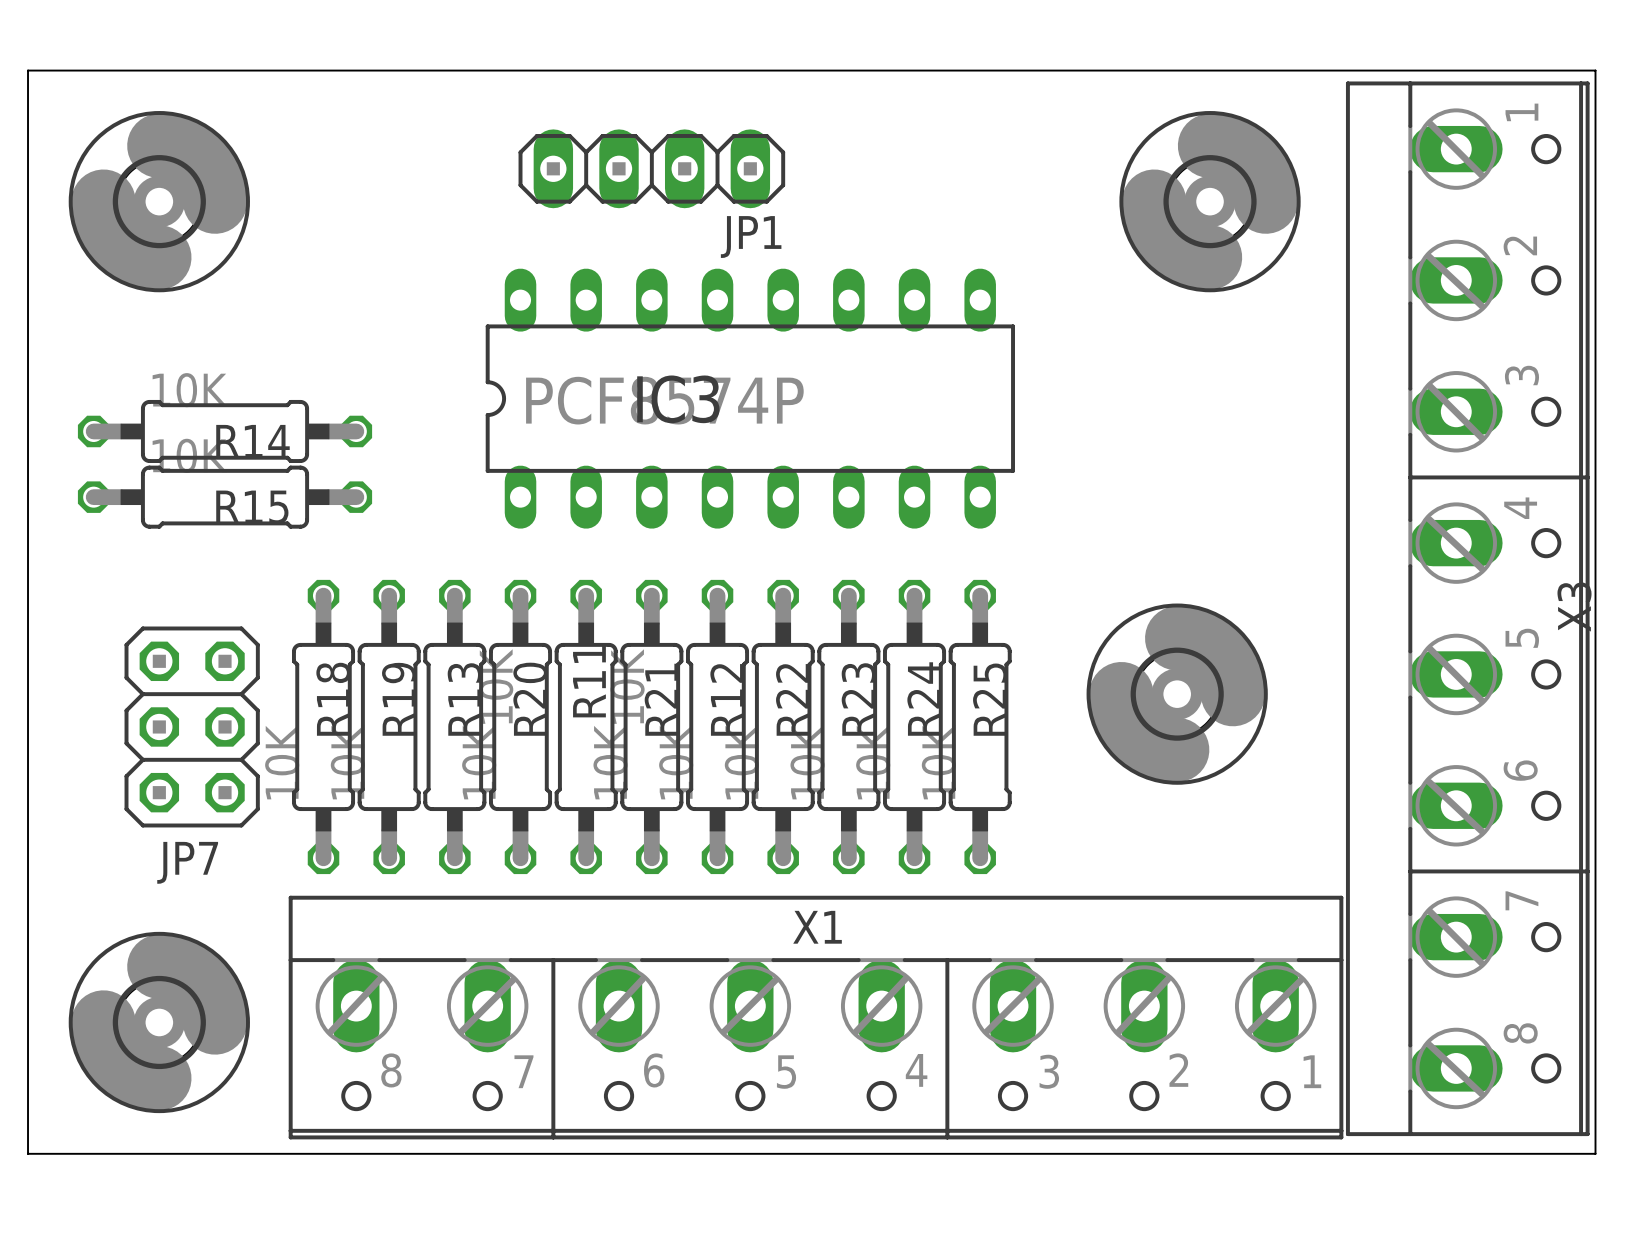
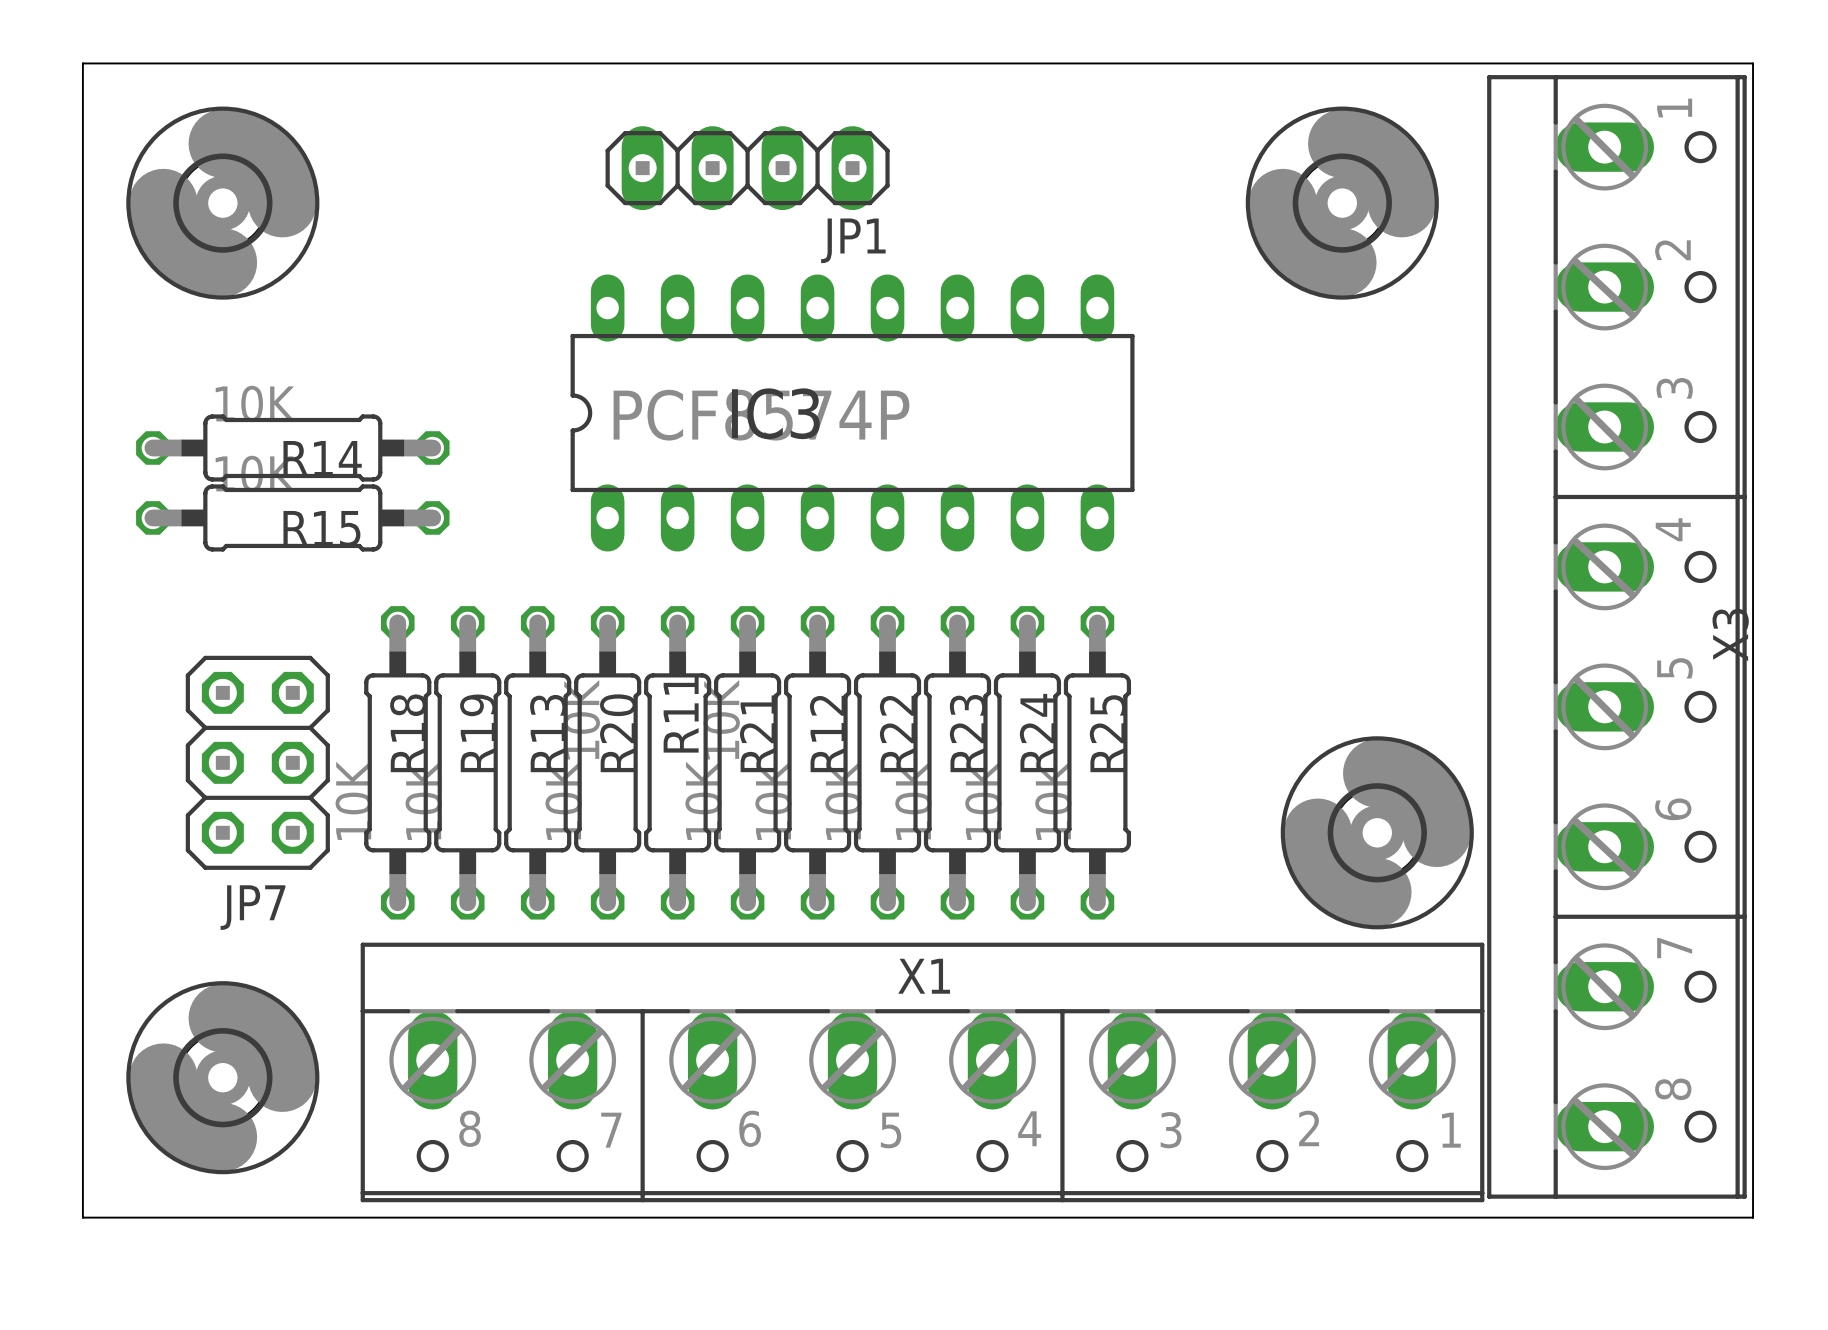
part position: (1177, 694) -> (1377, 832)

